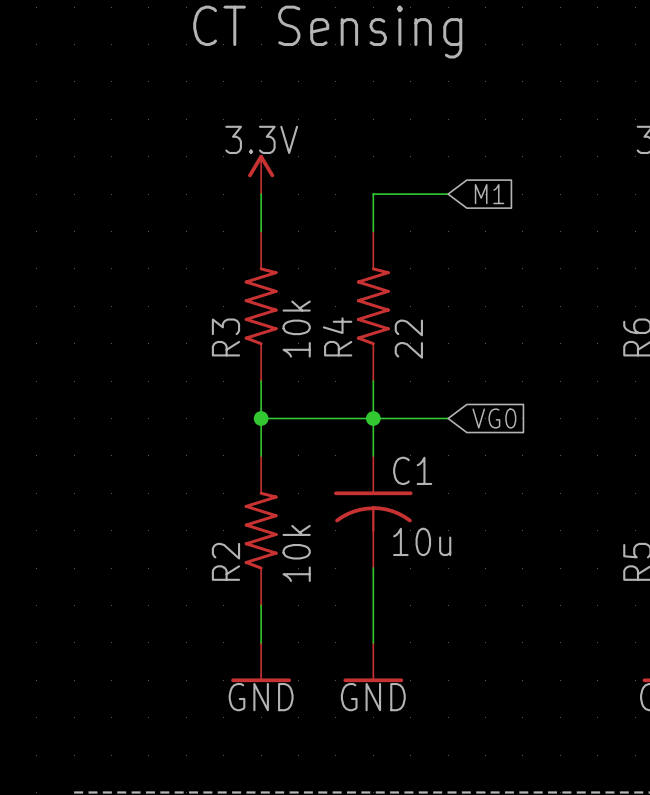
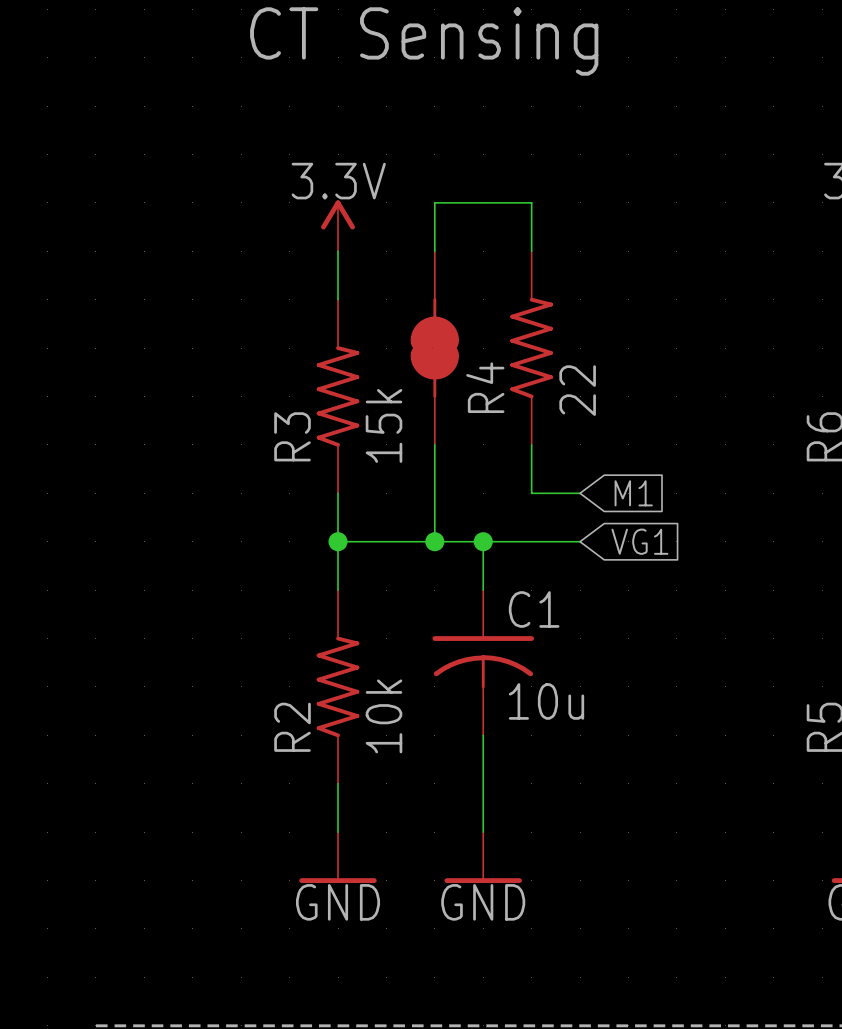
wire: none -> (434, 251) (434, 202) (531, 202) (531, 251)
wire: (448, 194) (373, 194) (373, 231) -> none
global label position: M1 (489, 194) -> M1 (633, 493)
part: none -> (434, 348)
R4 position: (373, 306) -> (531, 348)
R3 value: 10k (296, 329) -> 15k (383, 425)
wire: none -> (434, 444) (434, 541)
wire: none -> (531, 444) (531, 493) (580, 493)
wire: (373, 381) (373, 418) -> none
junction: none -> (434, 541)
global label: VG0 (494, 418) -> VG1 (639, 541)

